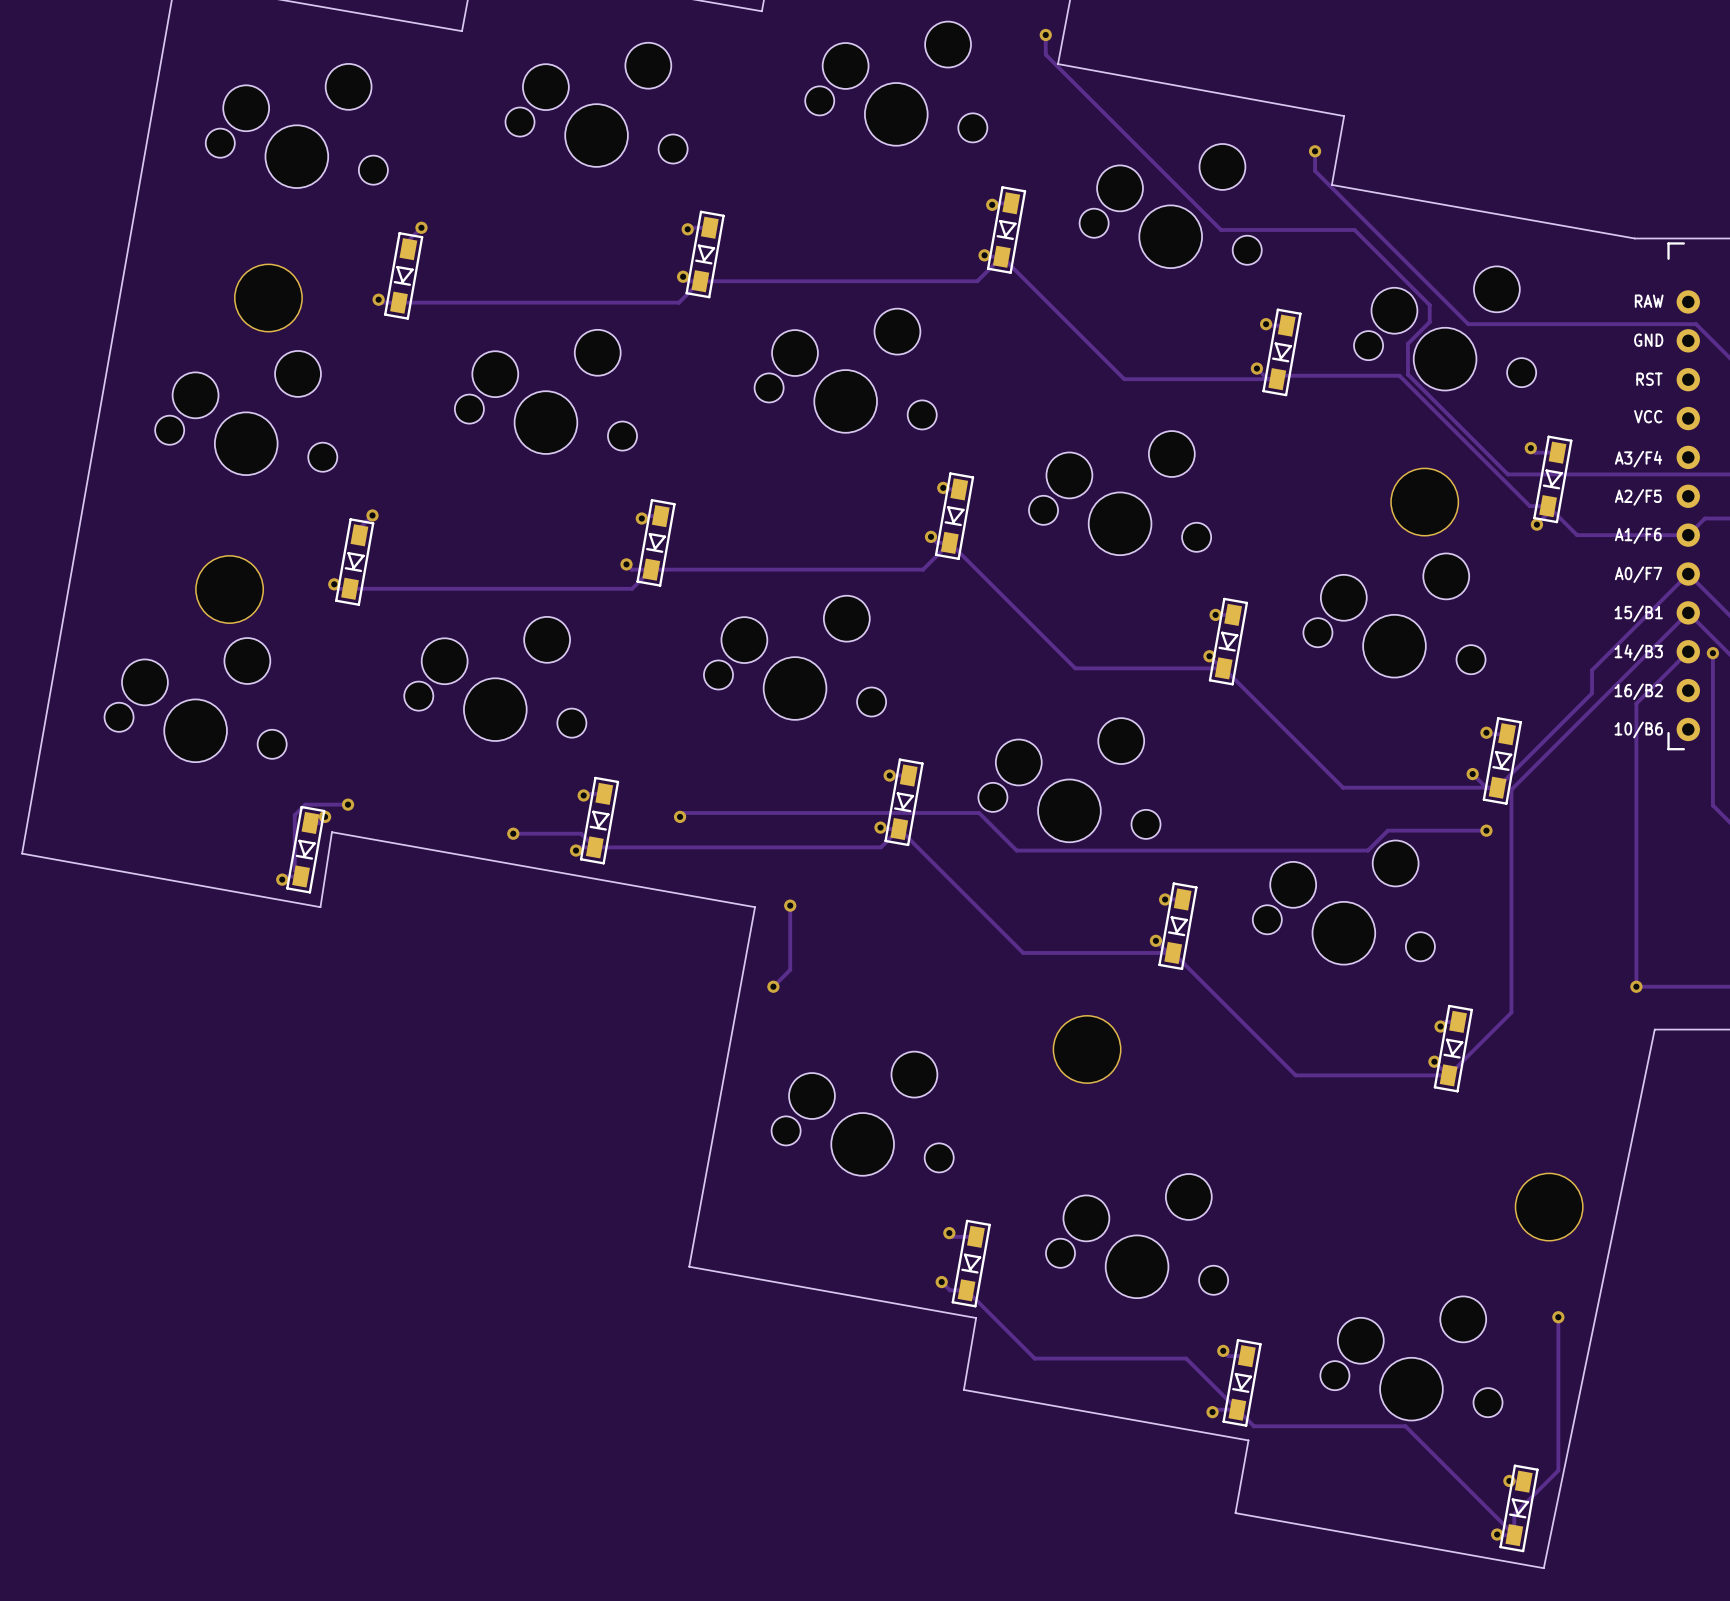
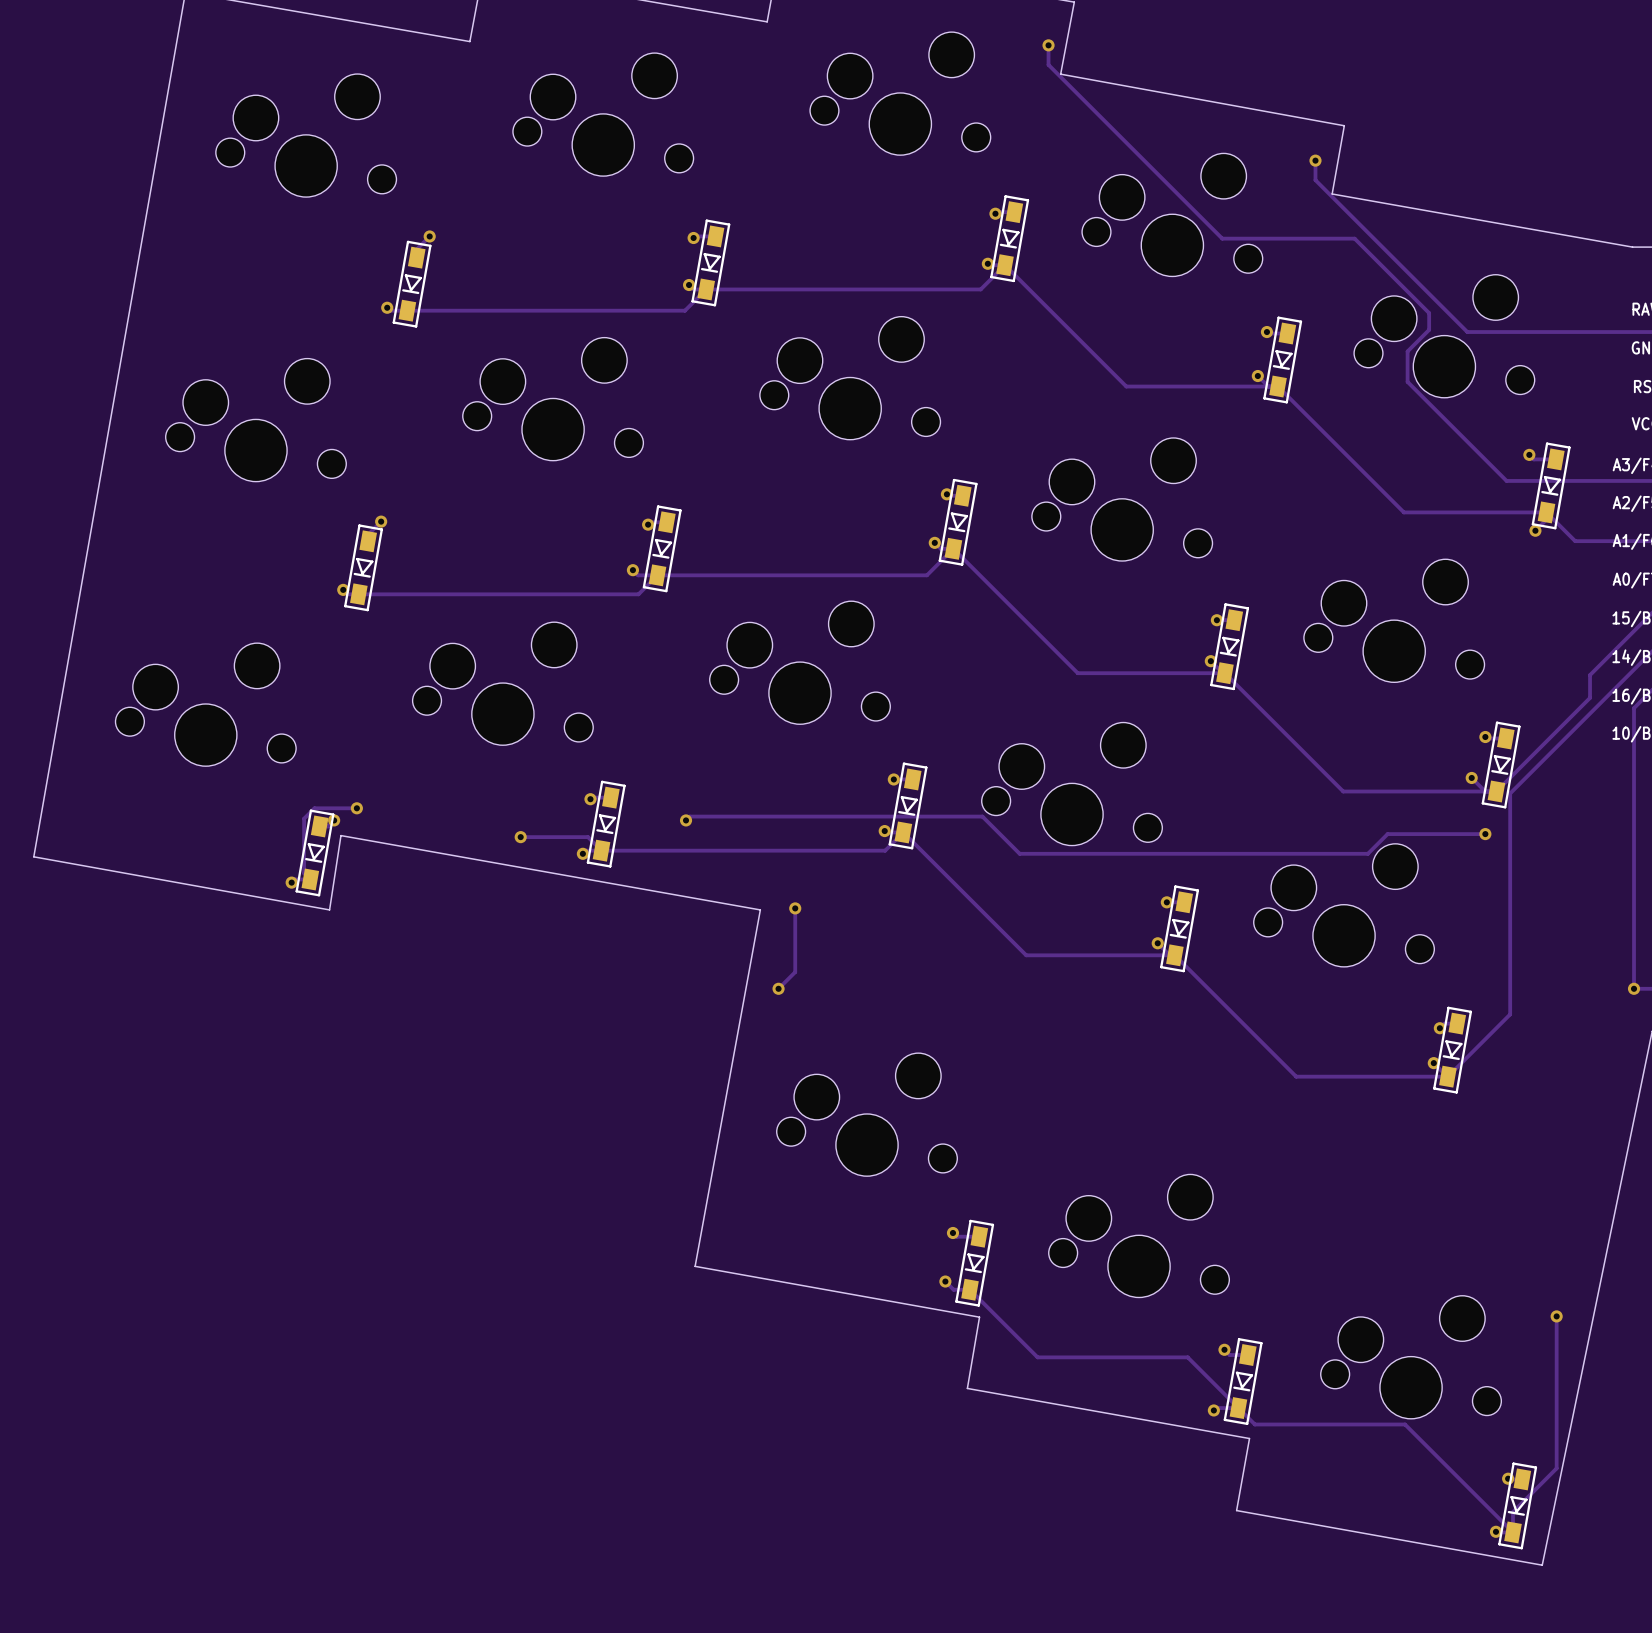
part: (268, 298) -> none
track: (1277, 379) (1280, 375) (1399, 375) (1529, 506) -> (1278, 386) (1403, 512) (1528, 512)
part: (1424, 502) -> none
part: (229, 589) -> none
part: (1087, 1049) -> none
part: (1549, 1207) -> none

